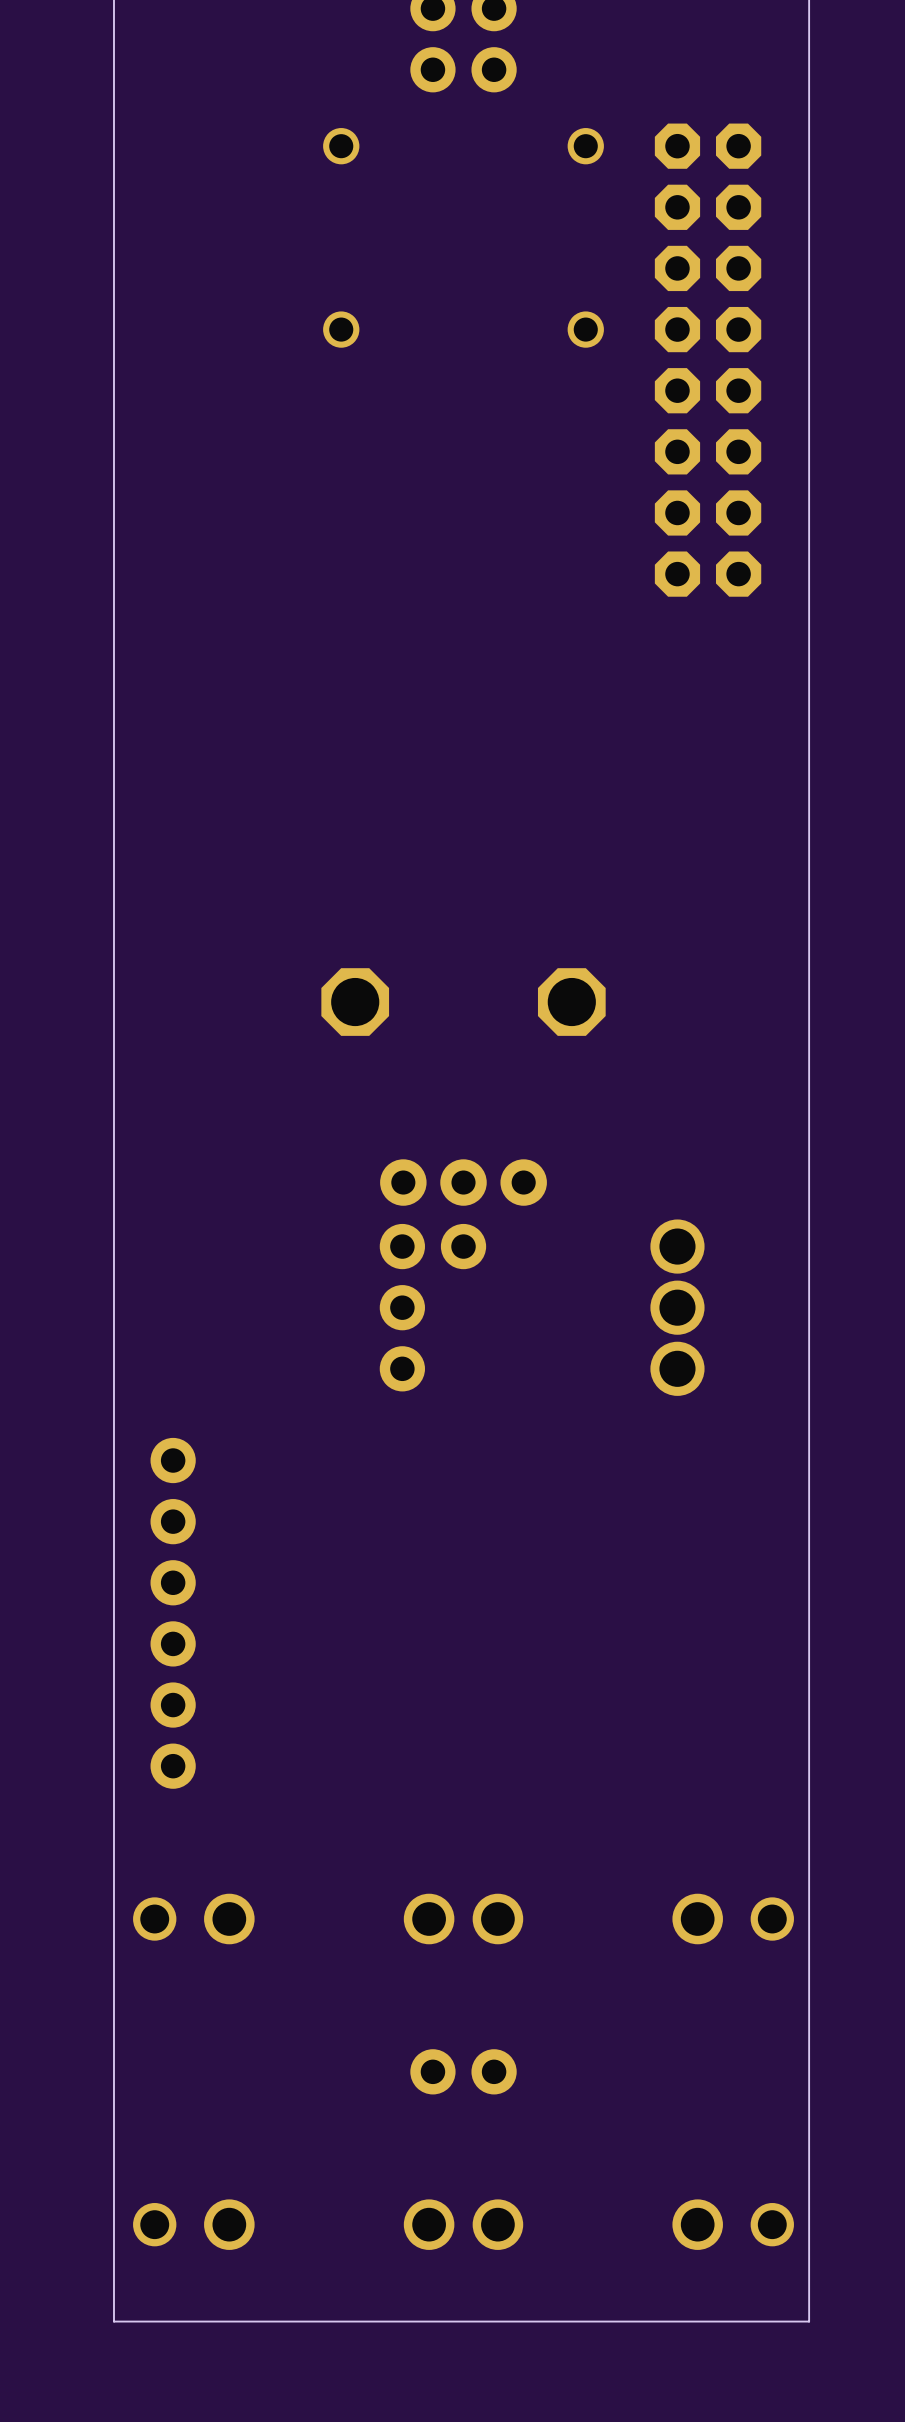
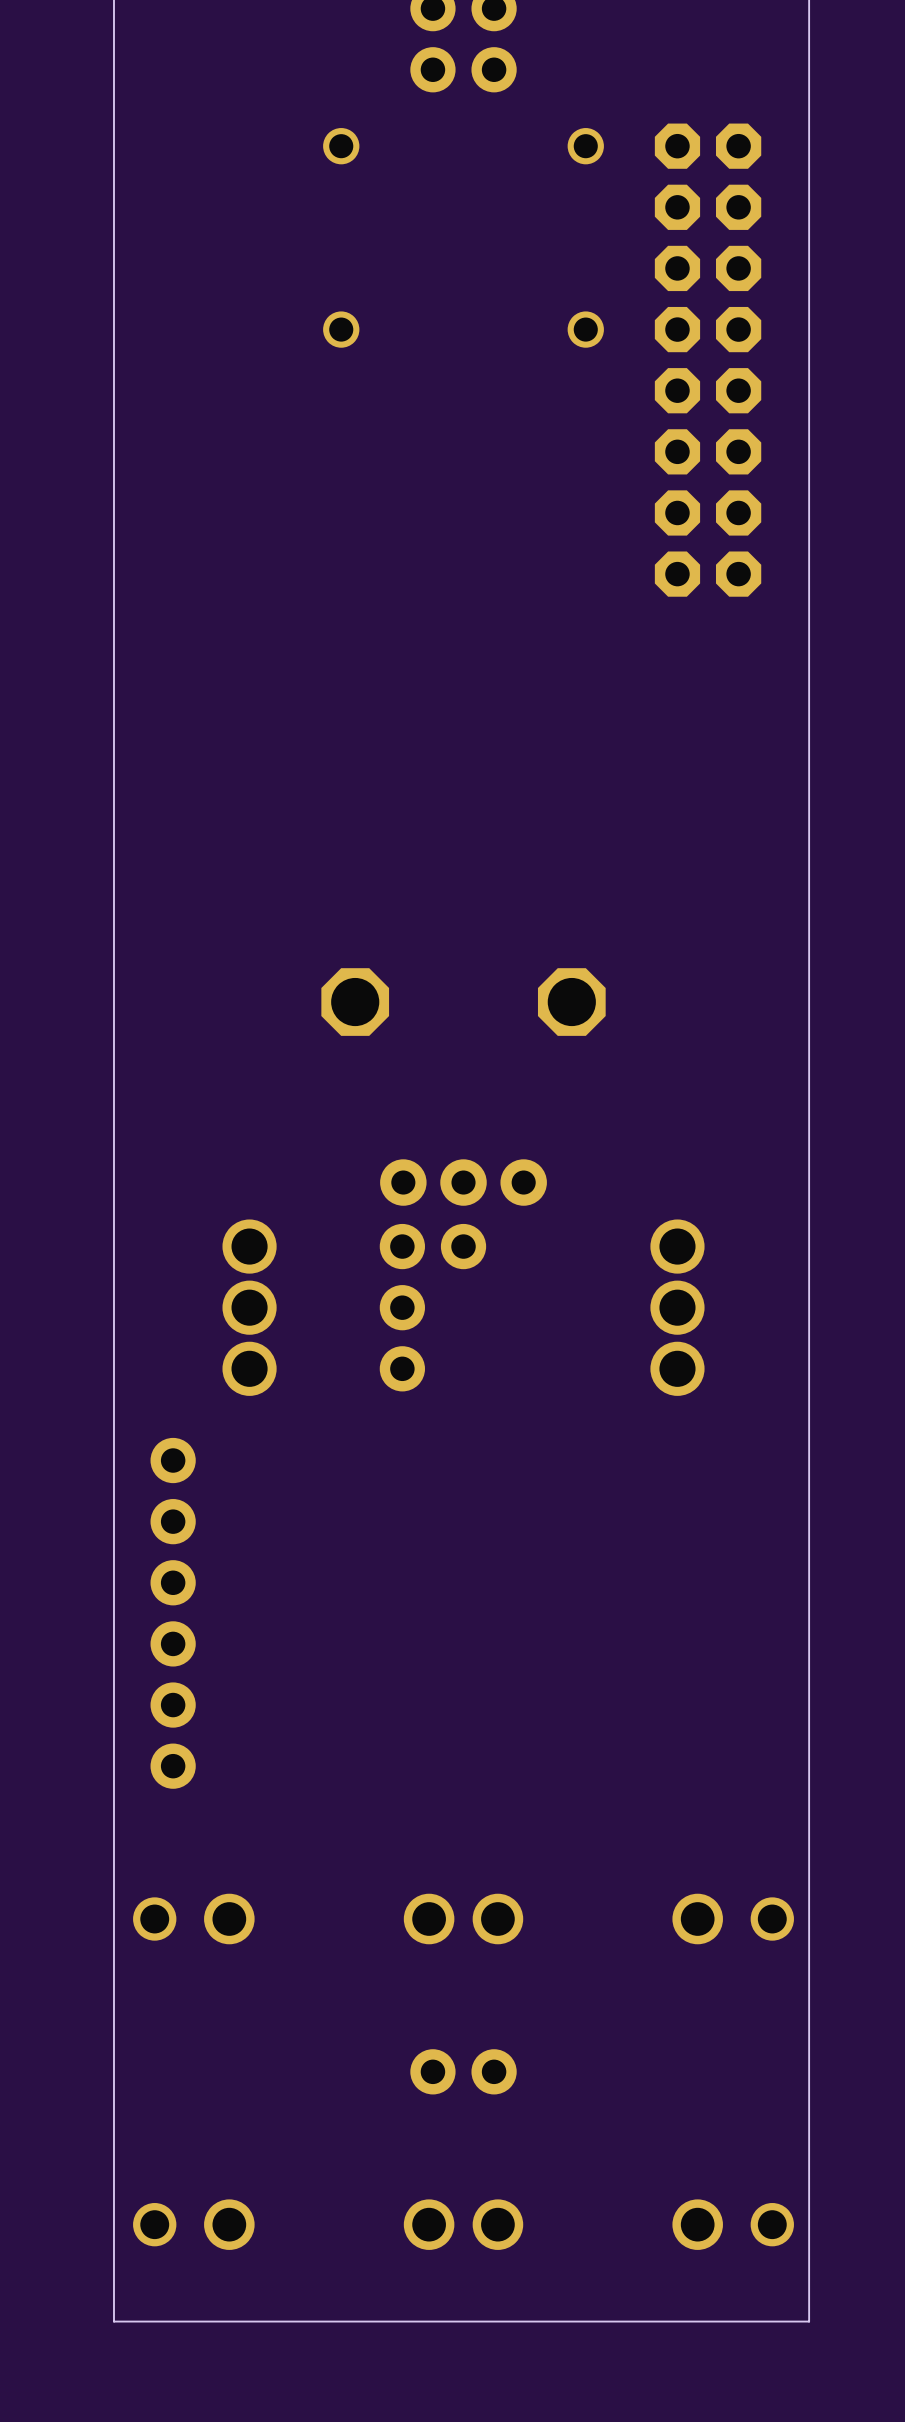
part: none -> (249, 1307)

